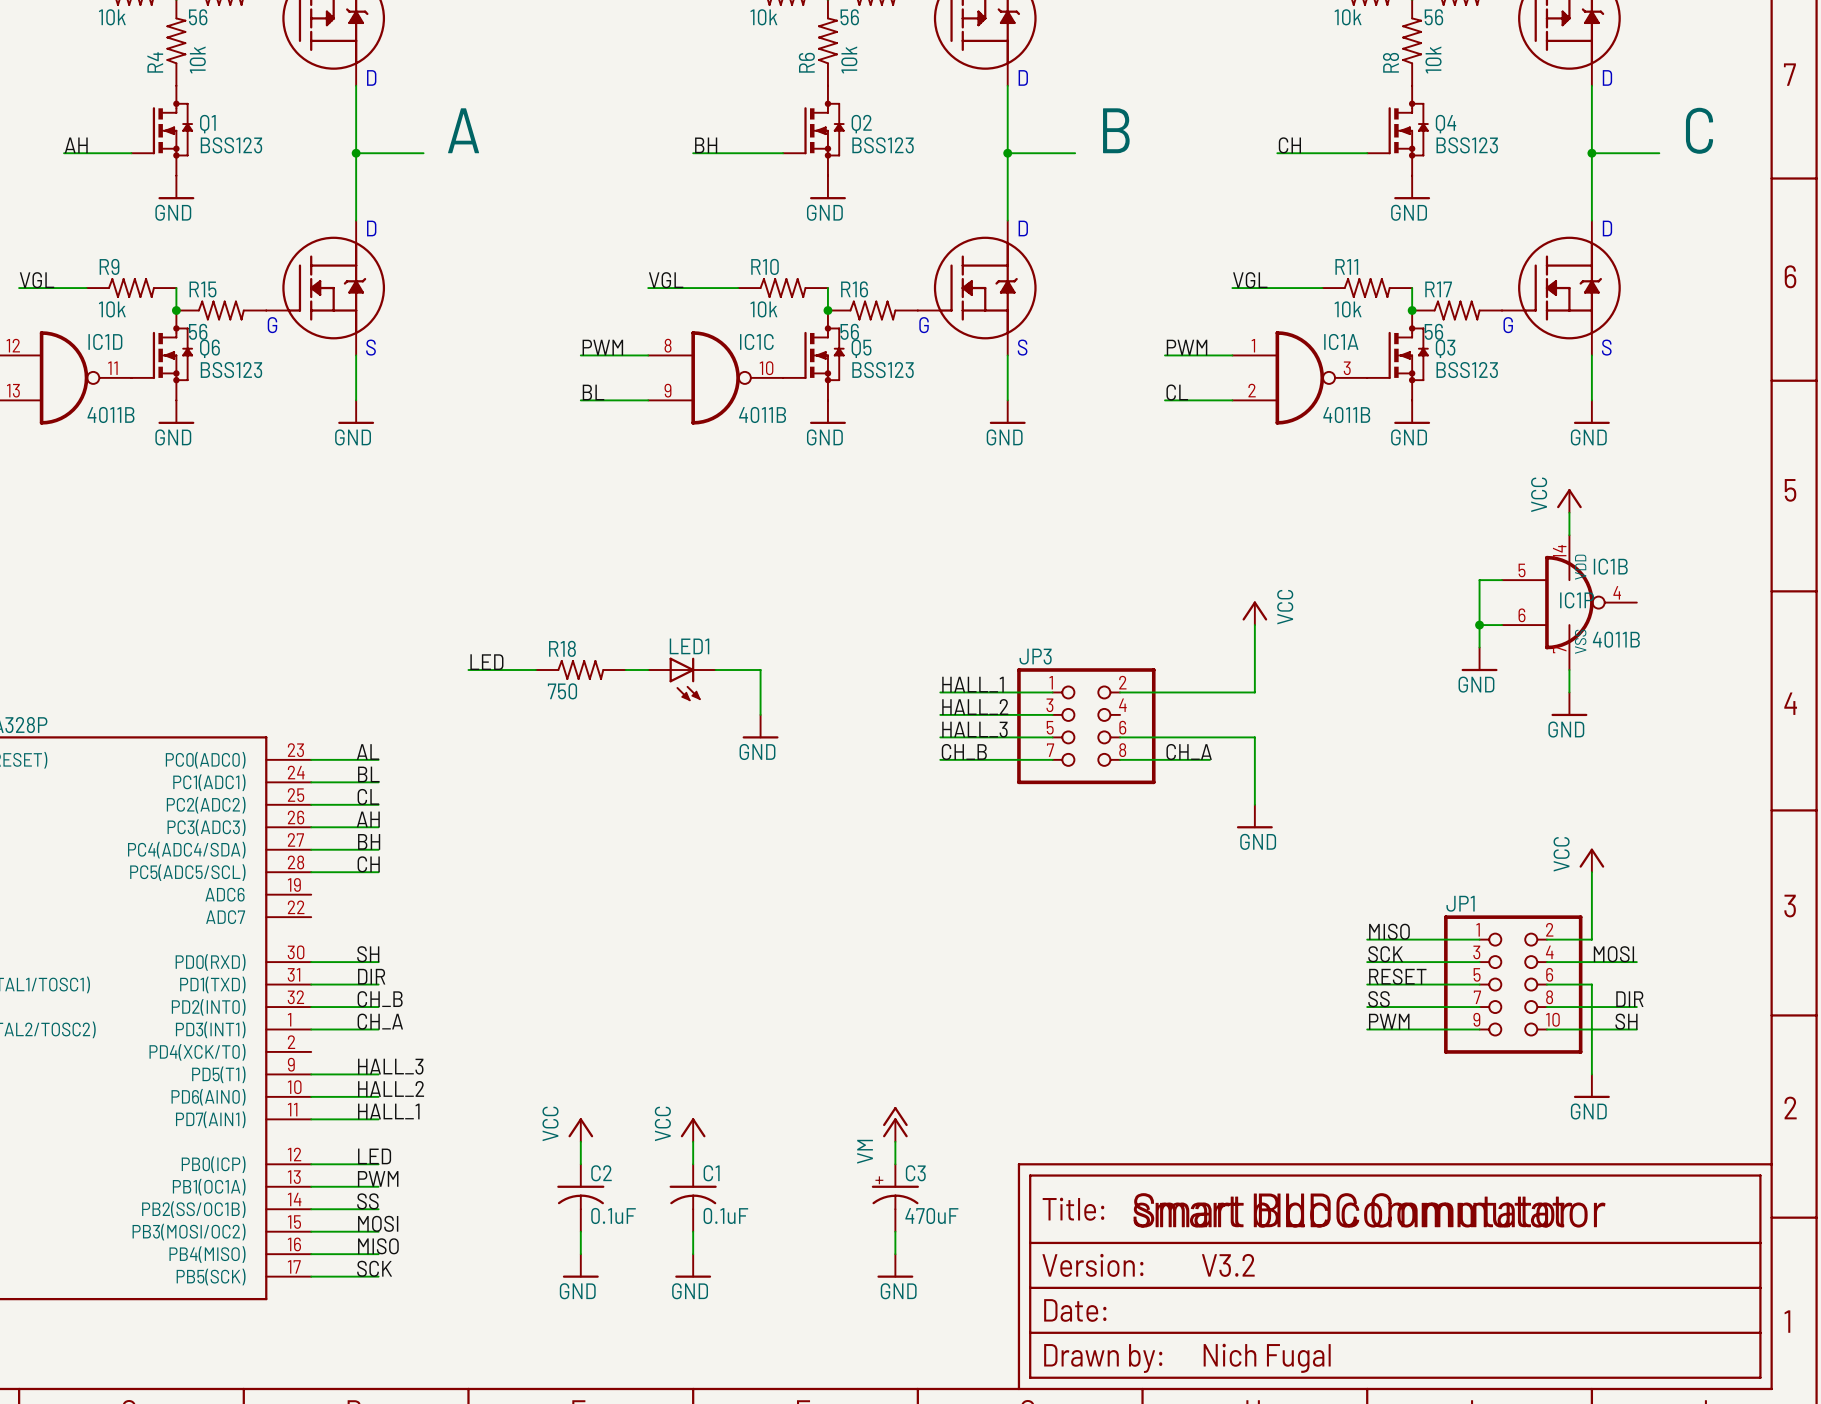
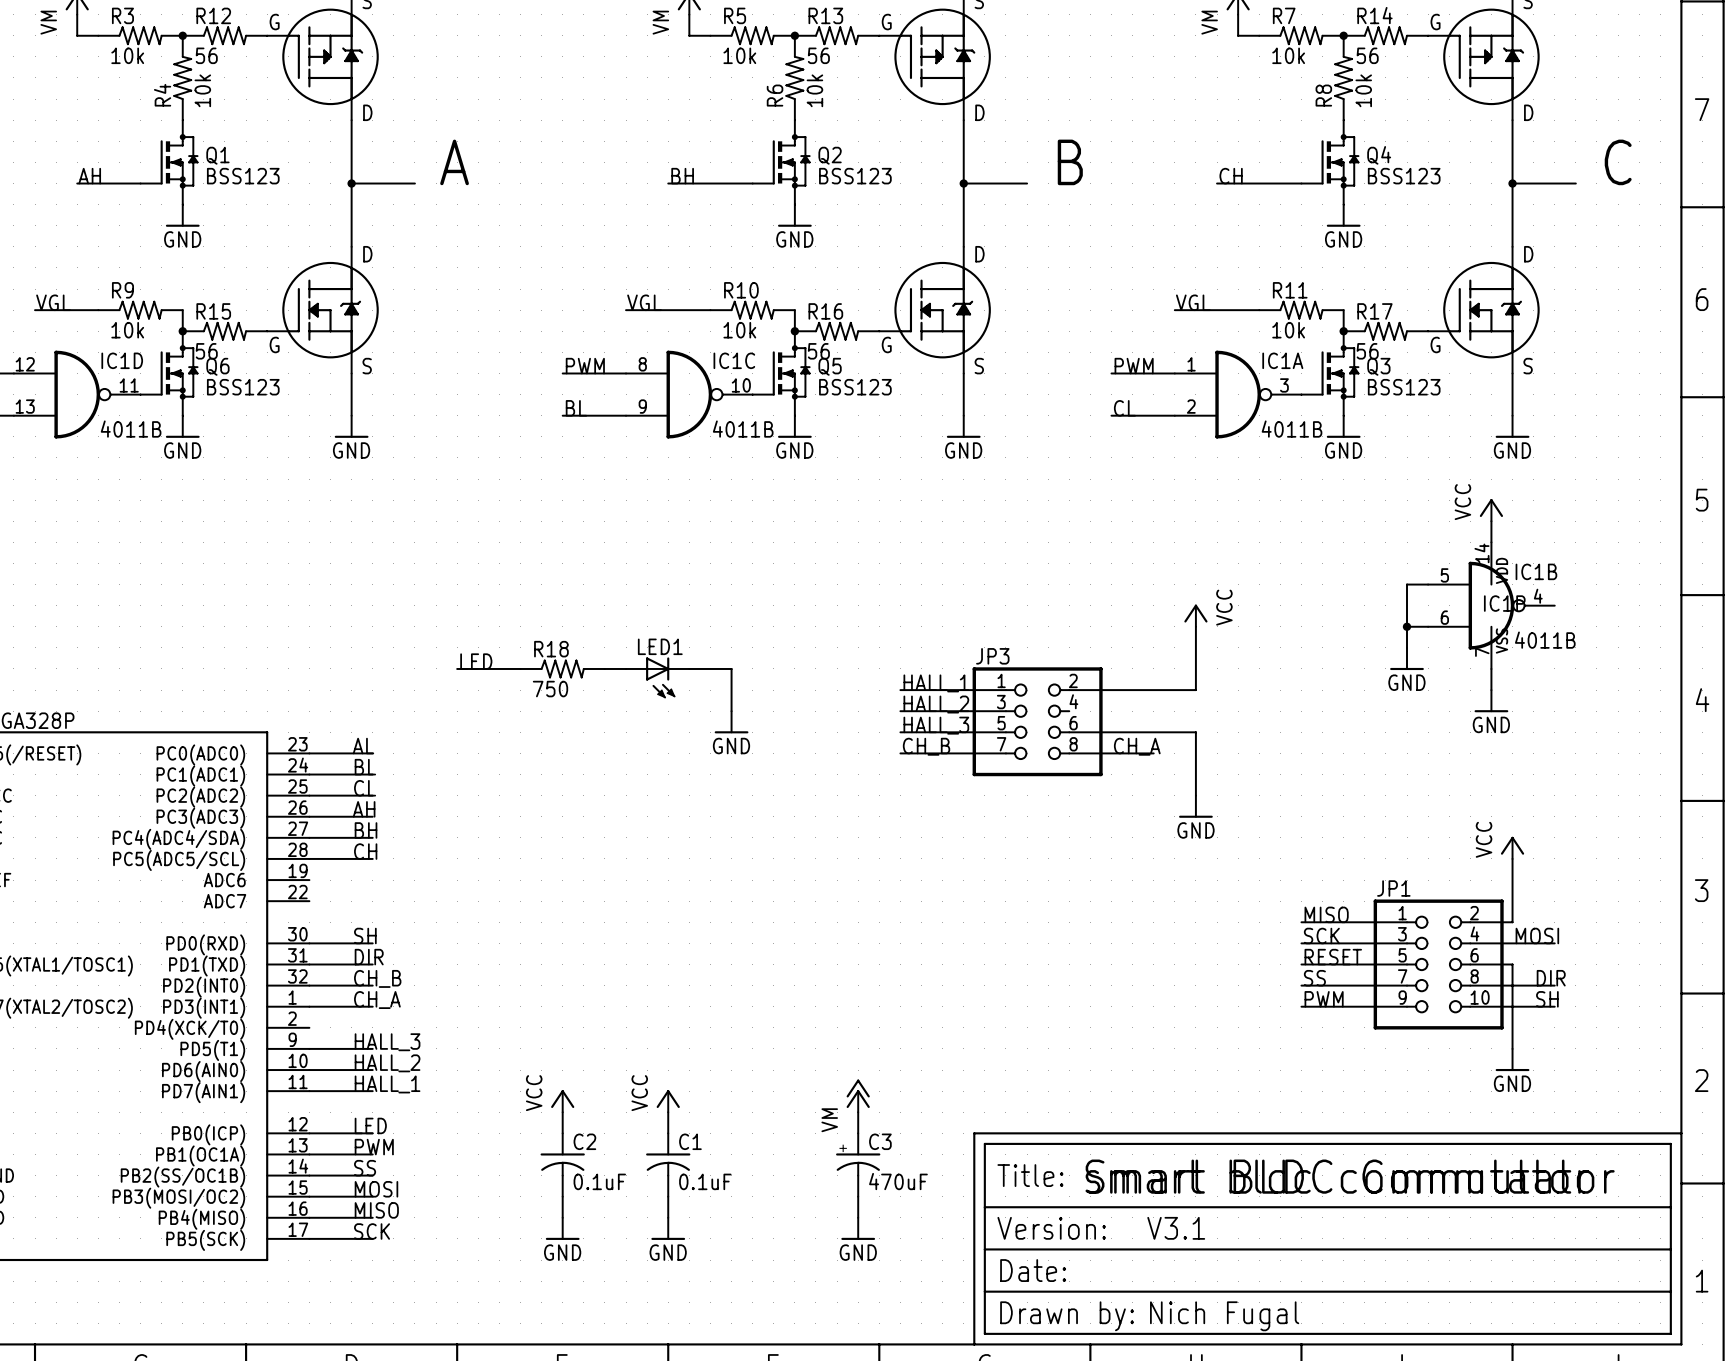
text: V3.2 (1228, 1265) -> V3.1 (1176, 1228)

